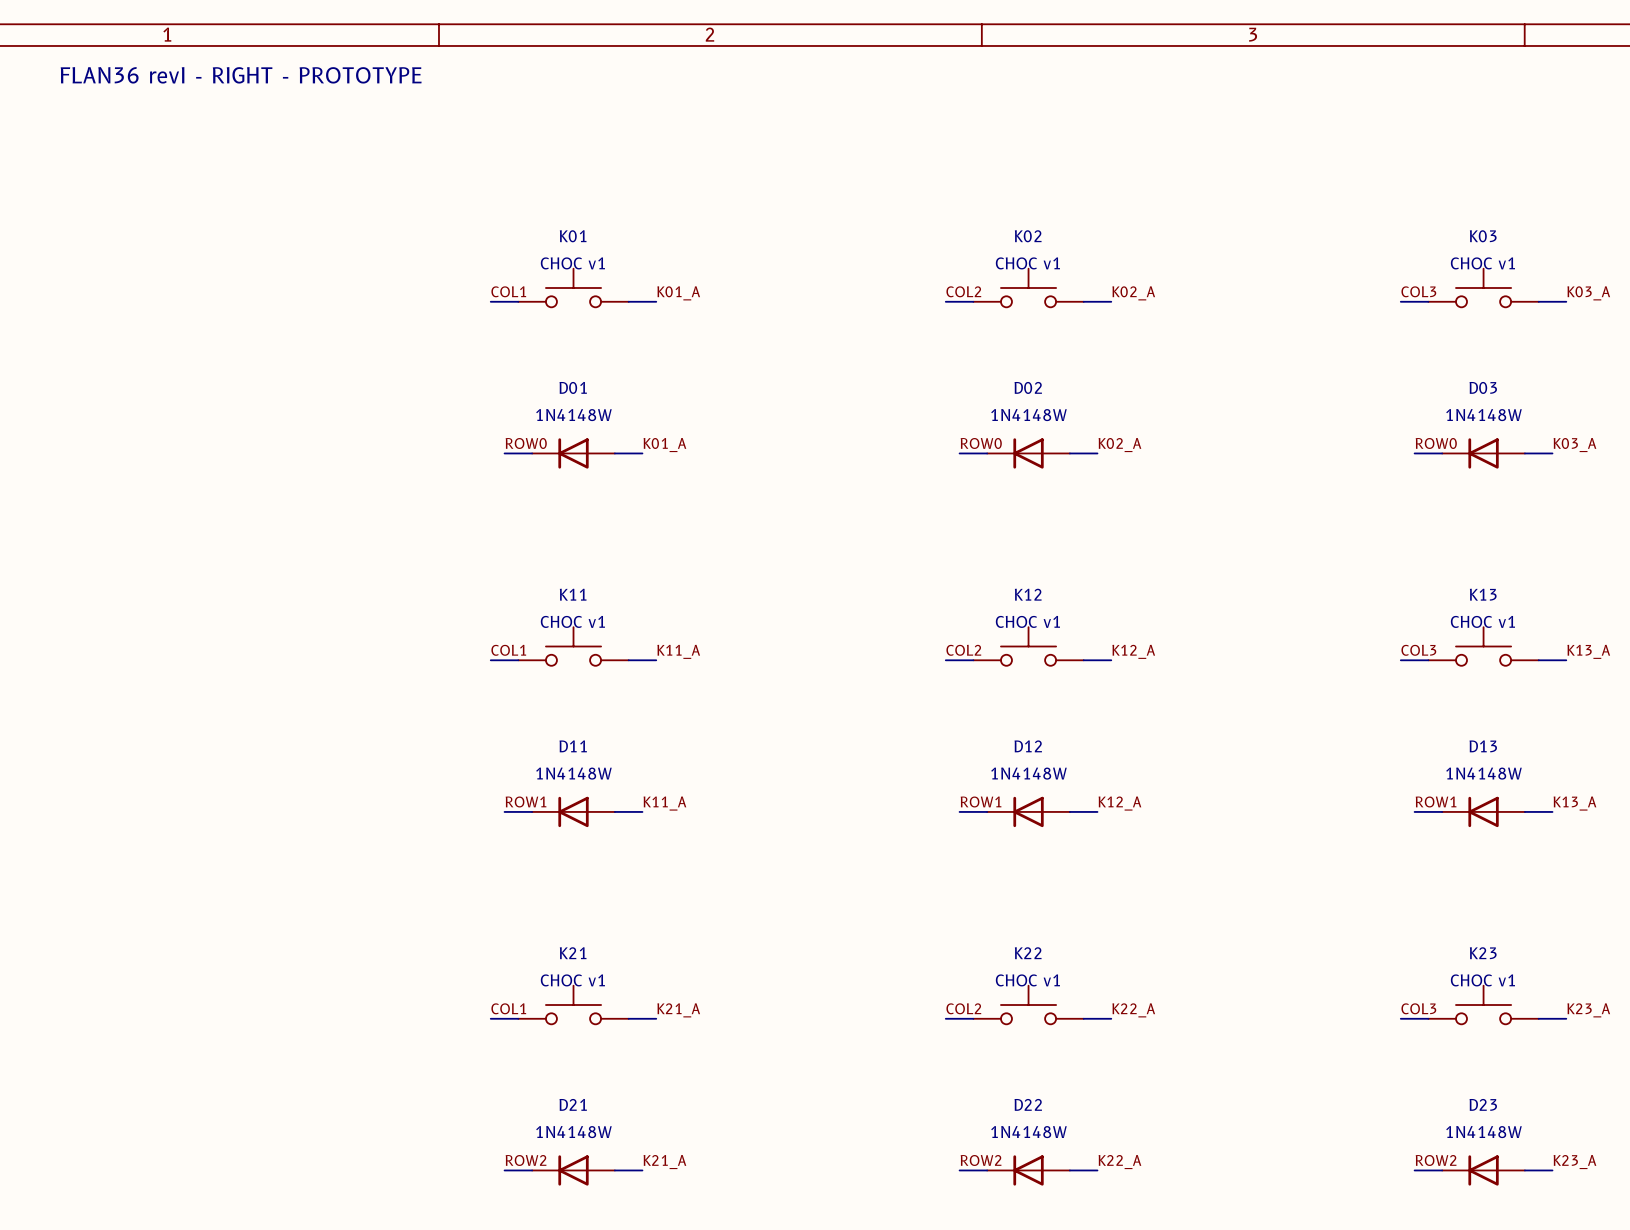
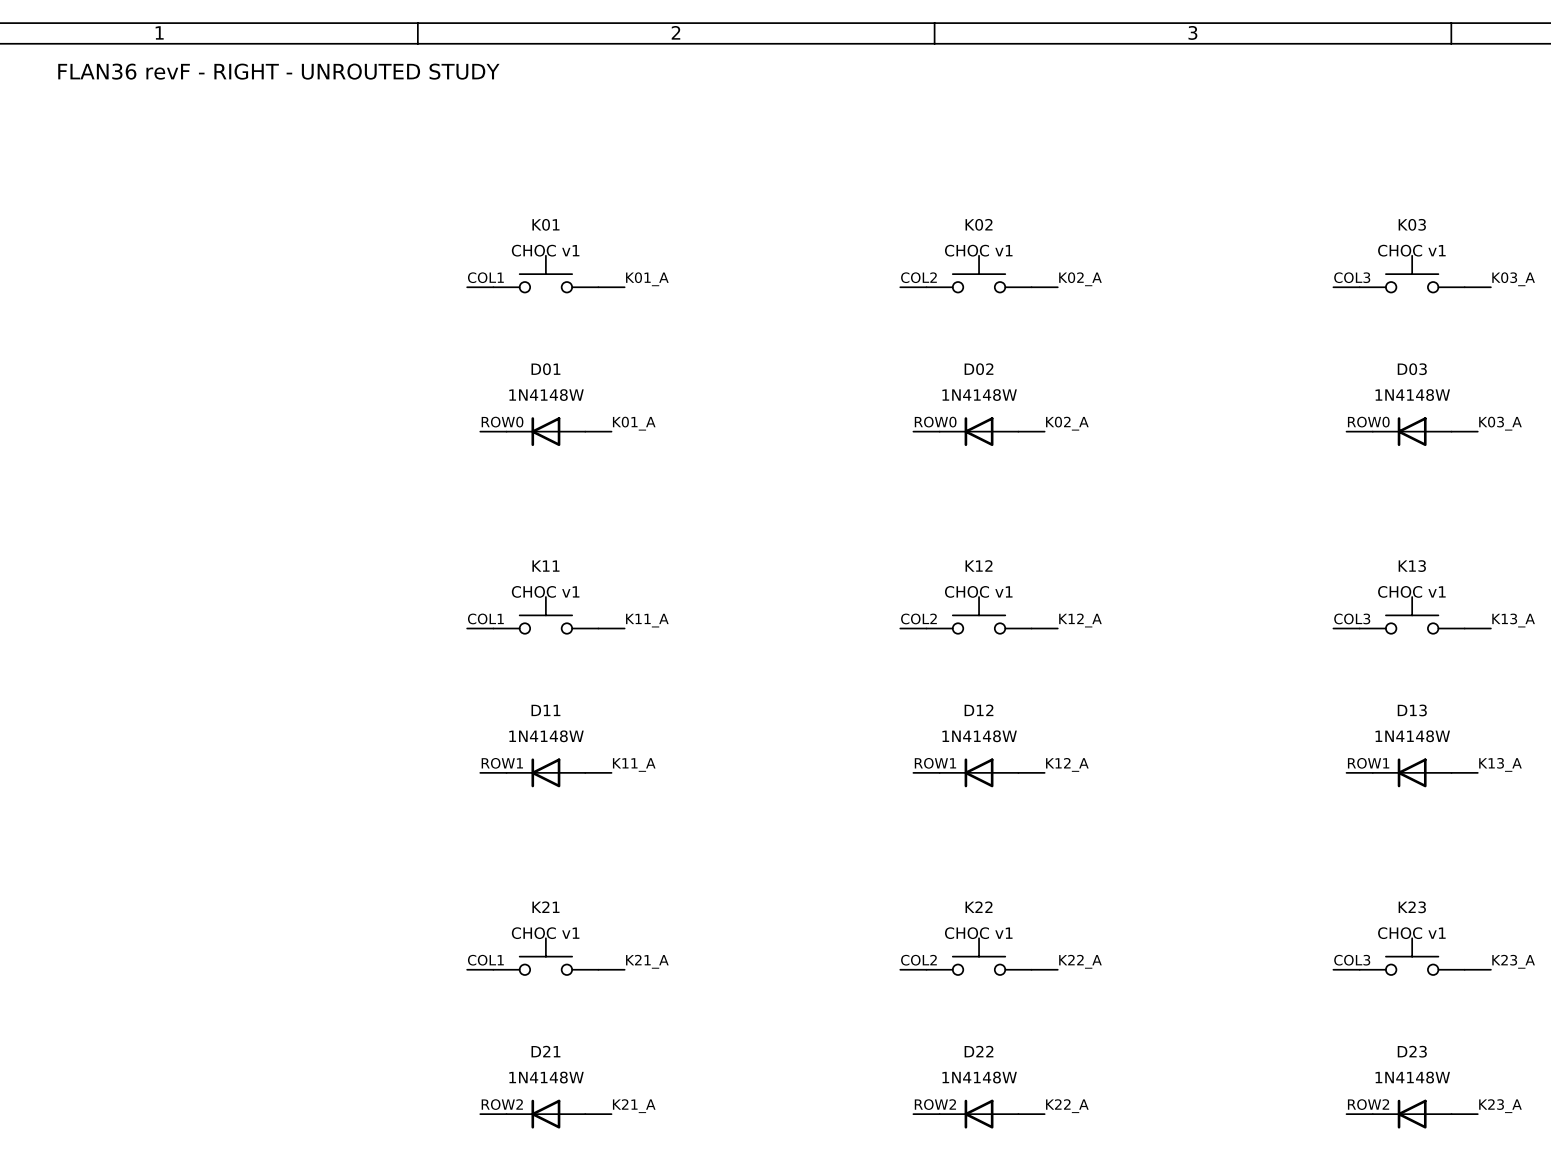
text: FLAN36 revI - RIGHT - PROTOTYPE (241, 75) -> FLAN36 revF - RIGHT - UNROUTED STUDY (278, 71)

